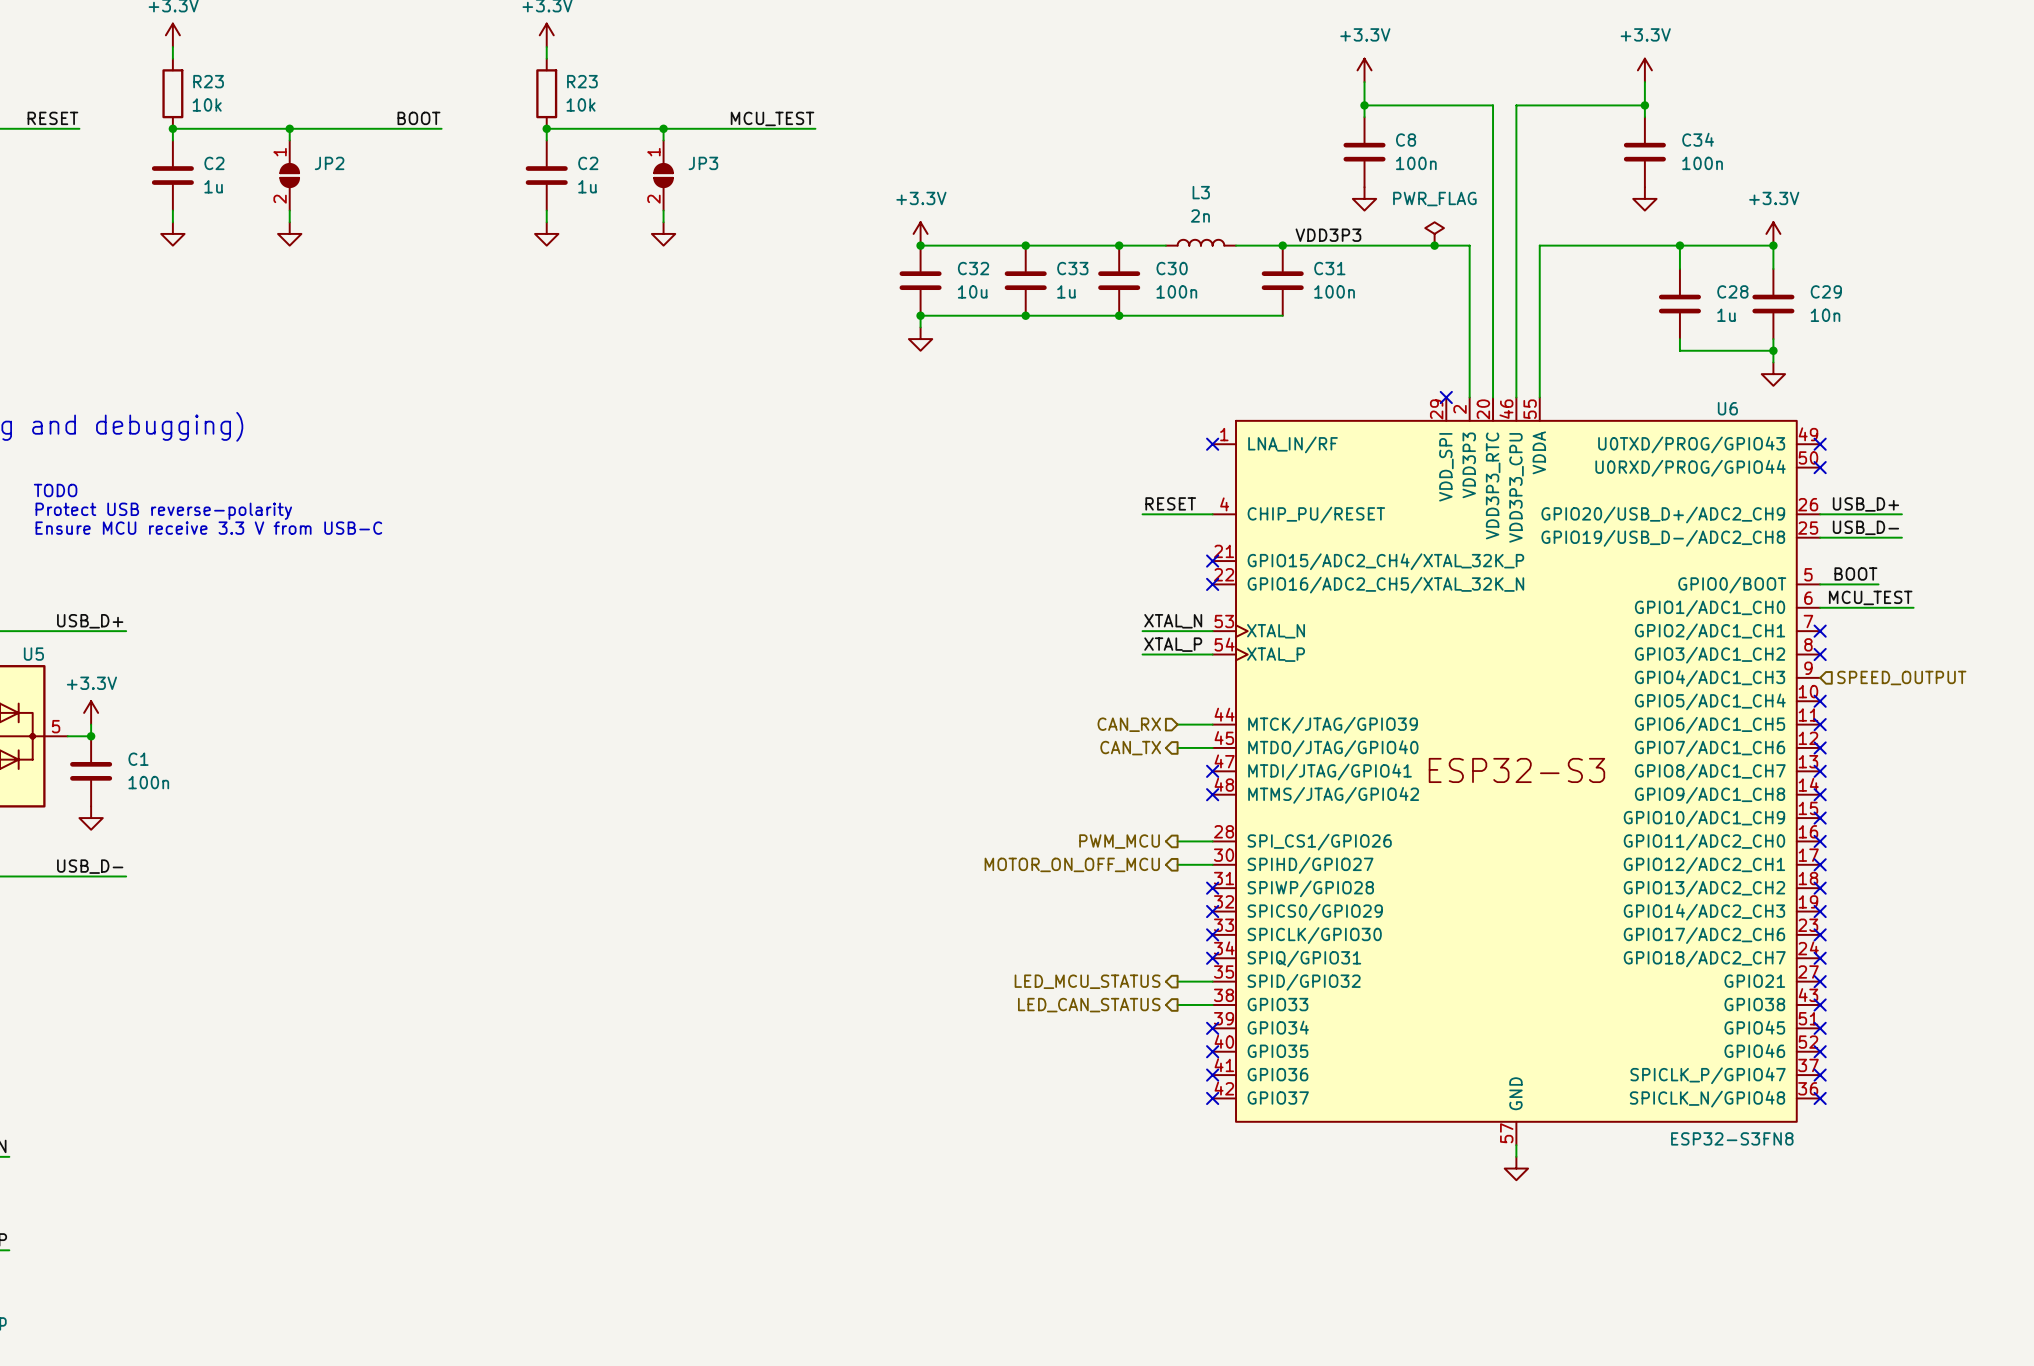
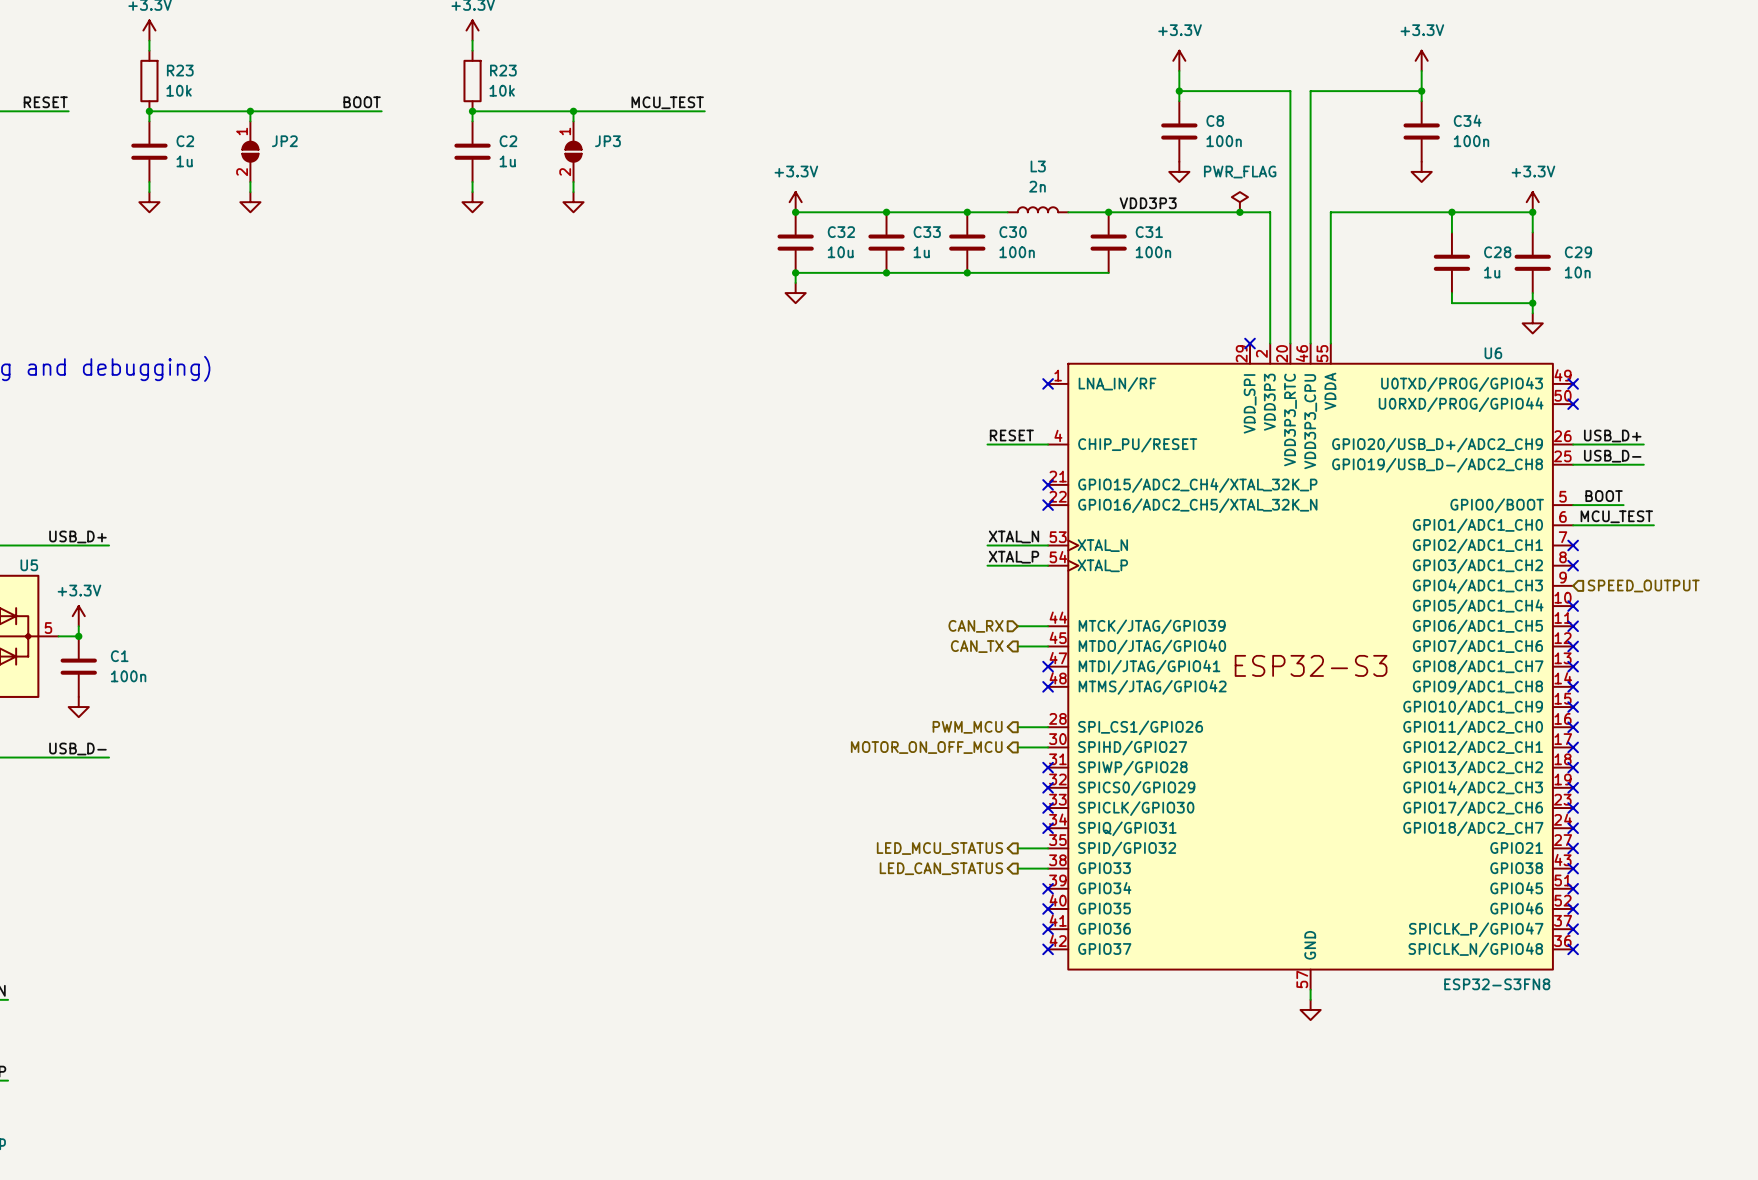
text: TODO (55, 490) -> none
text: Protect USB reverse-polarity (163, 511) -> none
text: Ensure MCU receive 3.3 V from USB-C (208, 528) -> none

